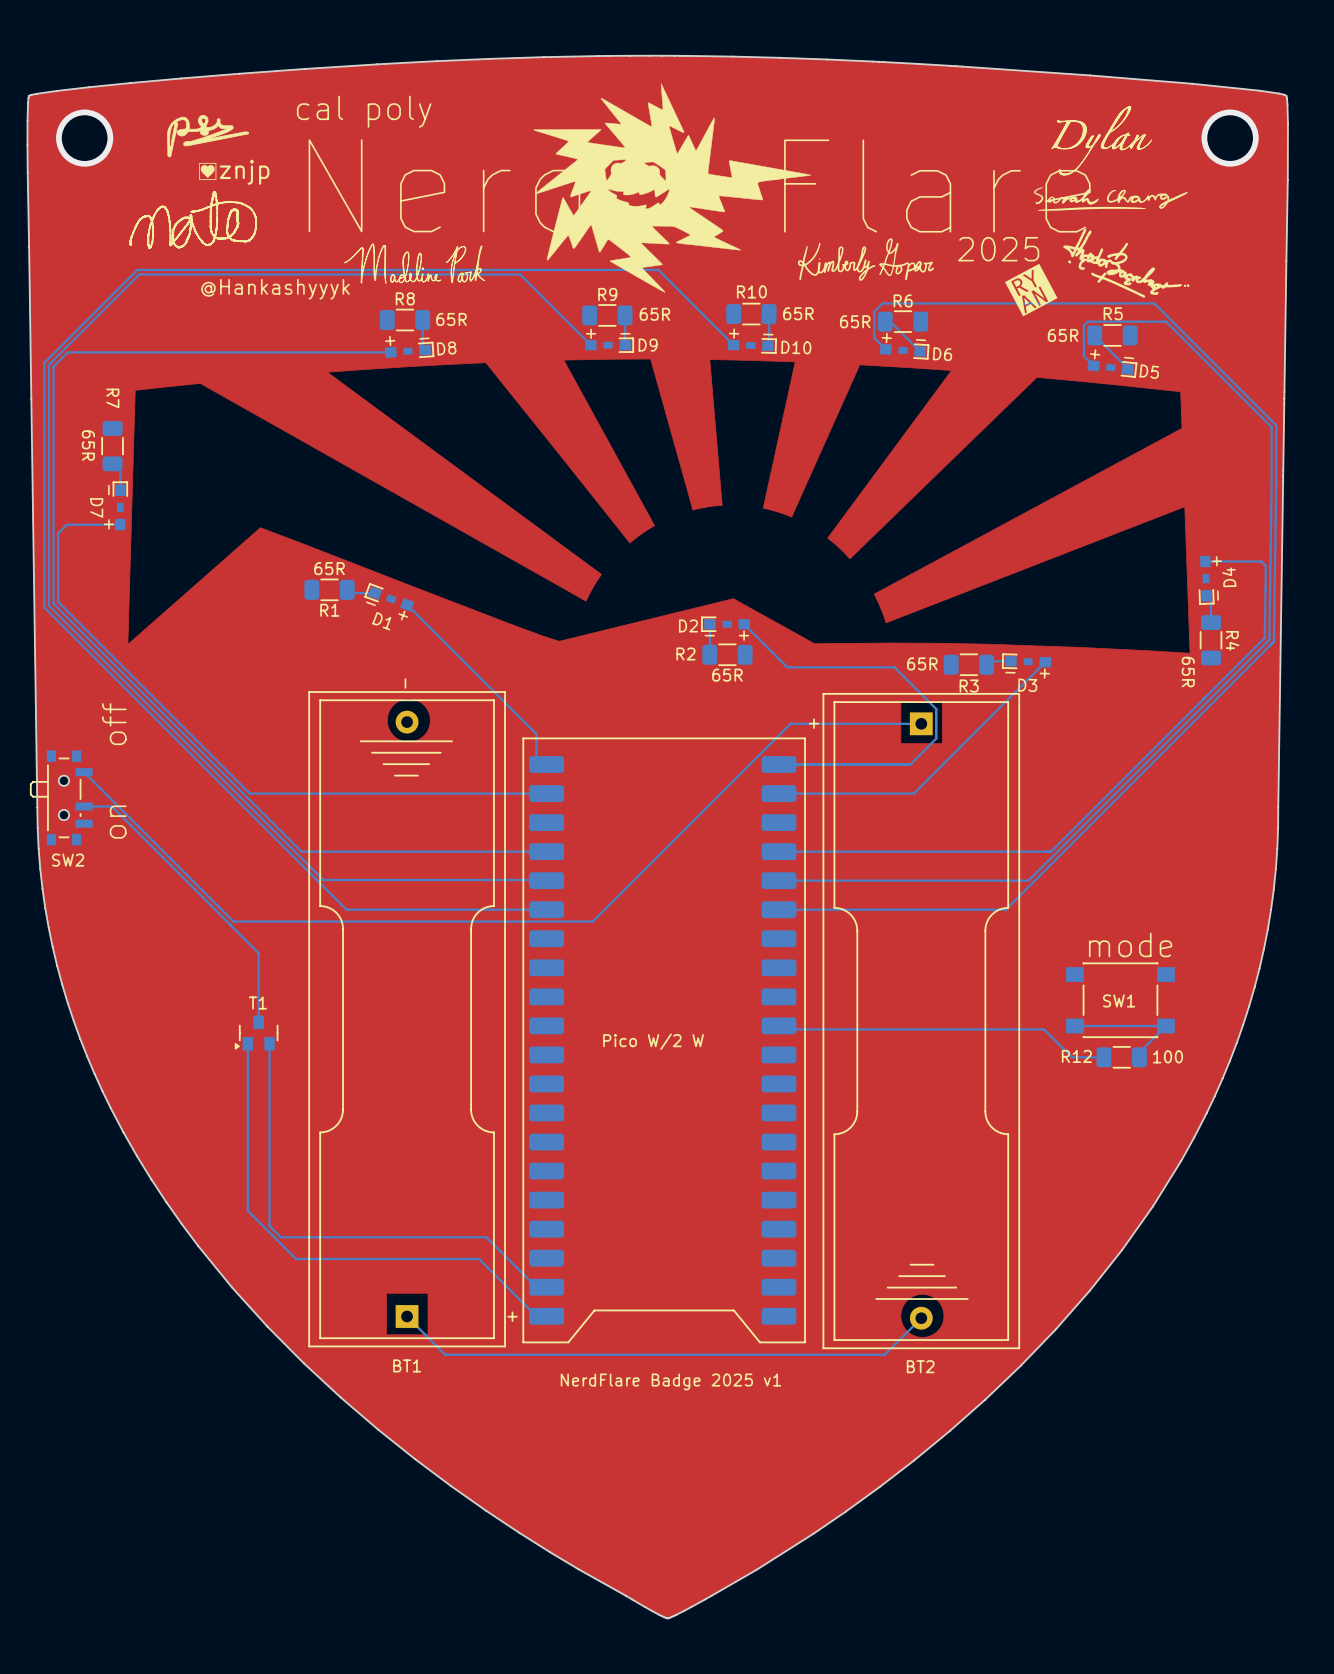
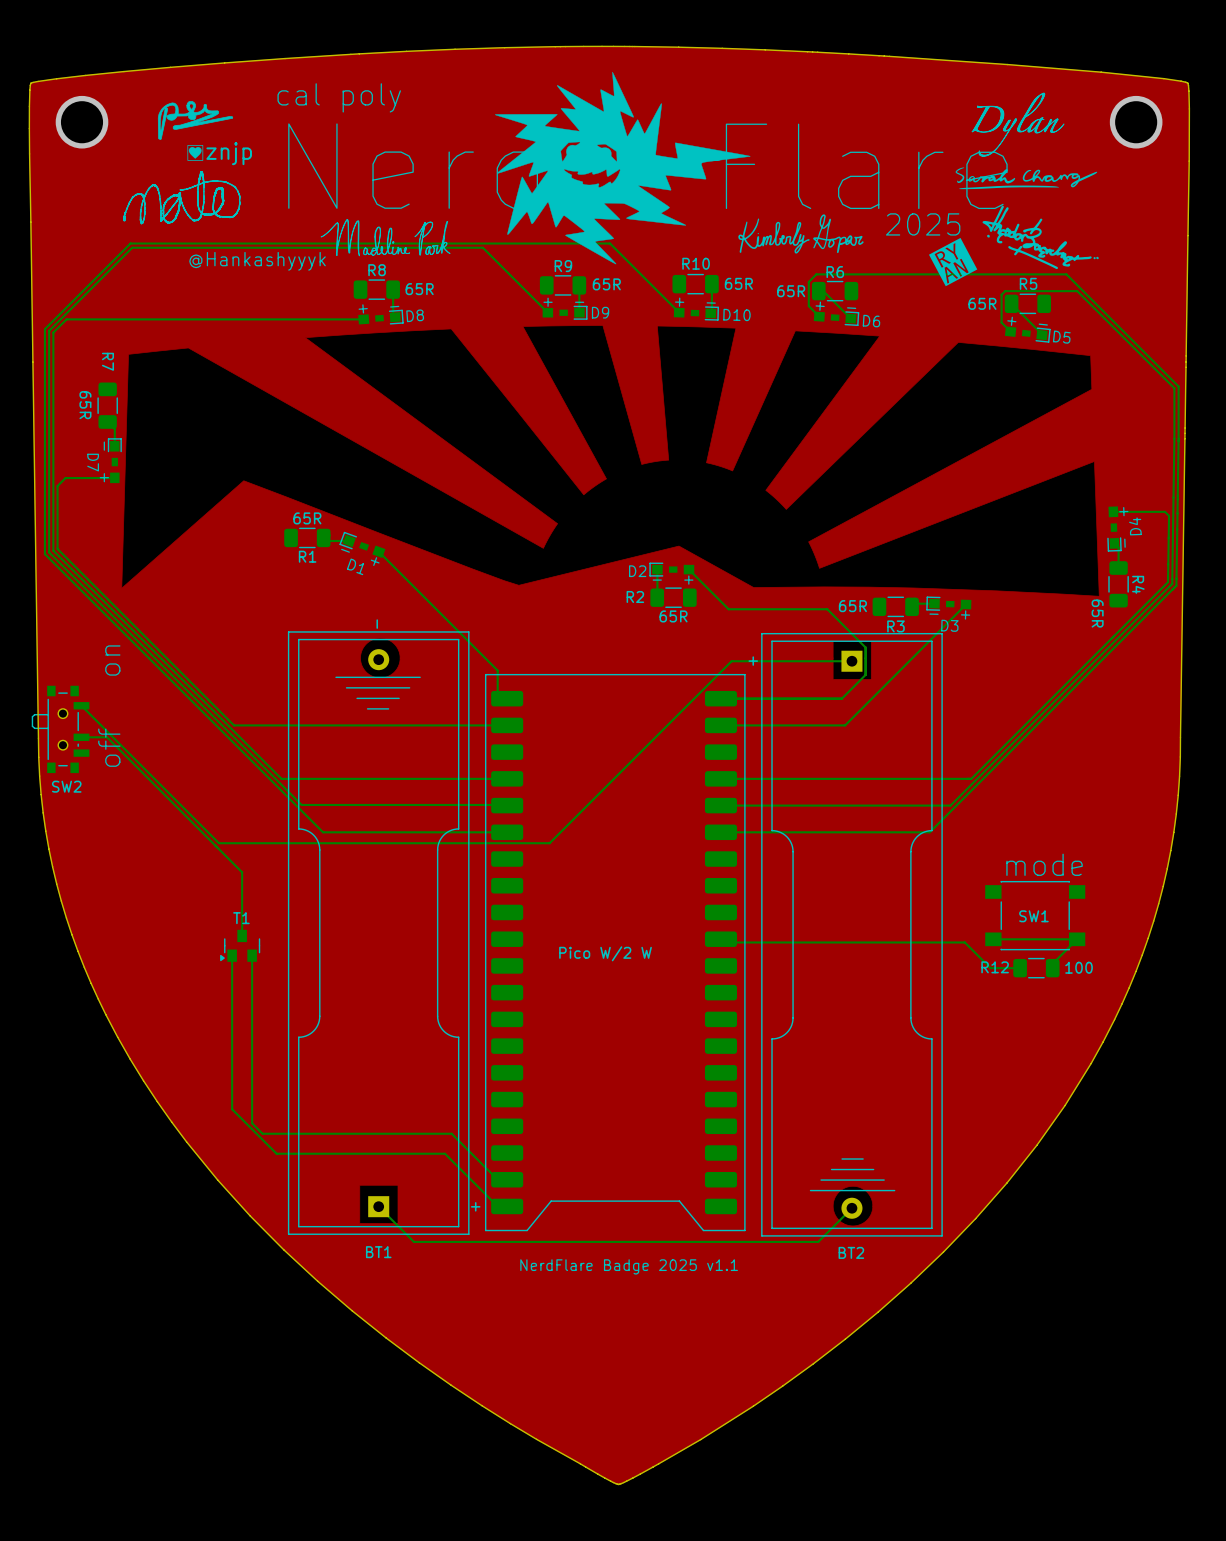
text: on off (114, 770) -> off on (109, 706)
text: NerdFlare Badge 2025 v1 (670, 1381) -> NerdFlare Badge 2025 v1.1 (629, 1266)

